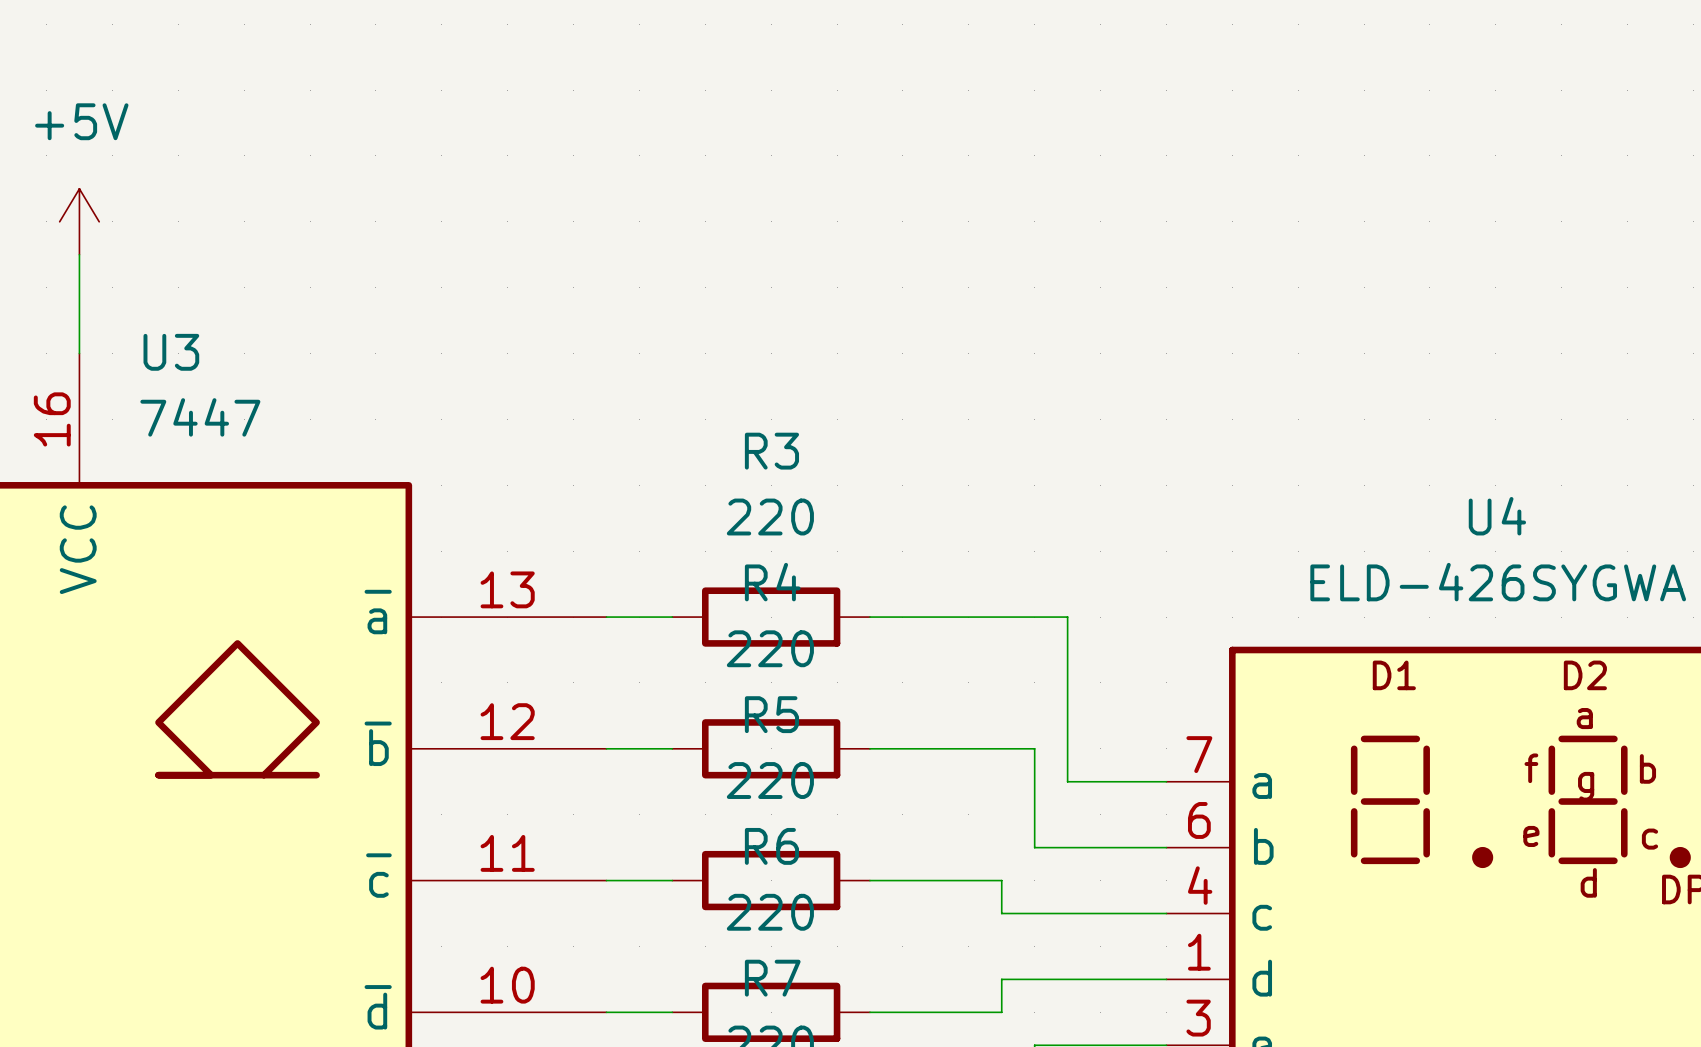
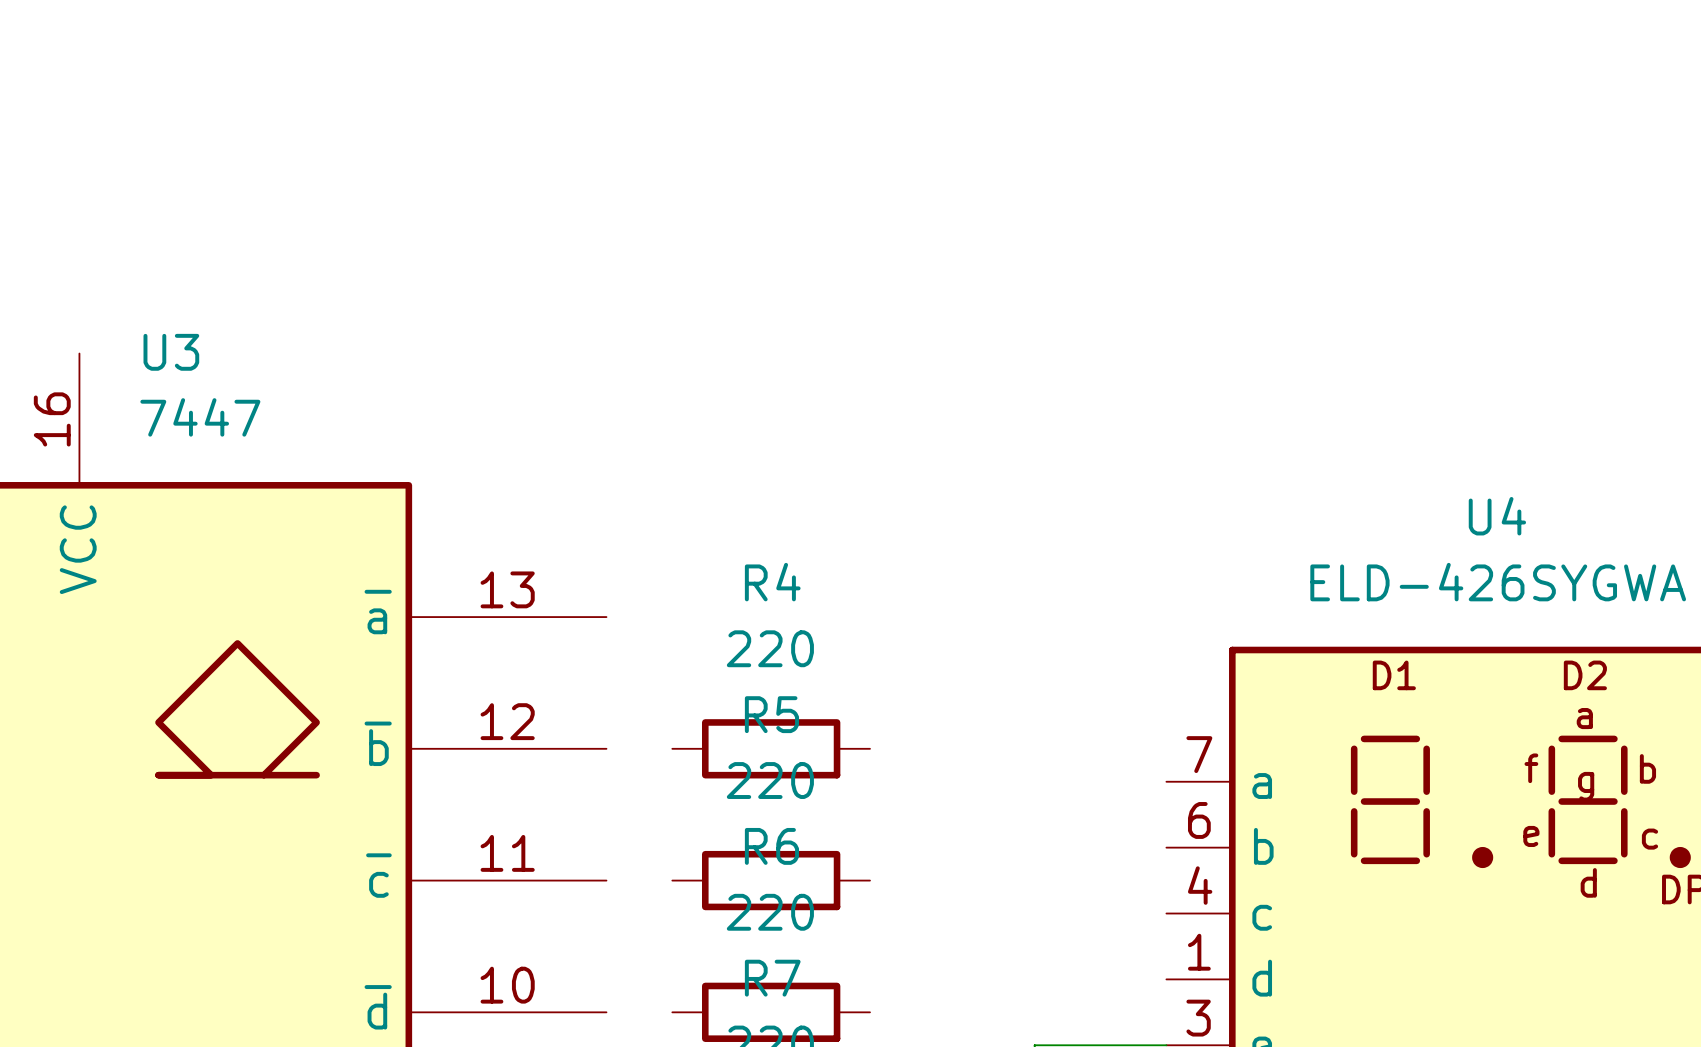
power symbol: +5V (79, 221) -> none
wire: (79, 254) (79, 353) -> none
wire: (606, 617) (672, 617) -> none
R3: 220 (771, 617) -> none
wire: (869, 617) (1067, 617) (1067, 781) (1166, 781) -> none
wire: (606, 748) (672, 748) -> none
wire: (869, 748) (1034, 748) (1034, 847) (1166, 847) -> none
wire: (606, 880) (672, 880) -> none
wire: (869, 880) (1001, 880) (1001, 913) (1166, 913) -> none
wire: (1166, 979) (1001, 979) (1001, 1012) (869, 1012) -> none
wire: (606, 1012) (672, 1012) -> none

